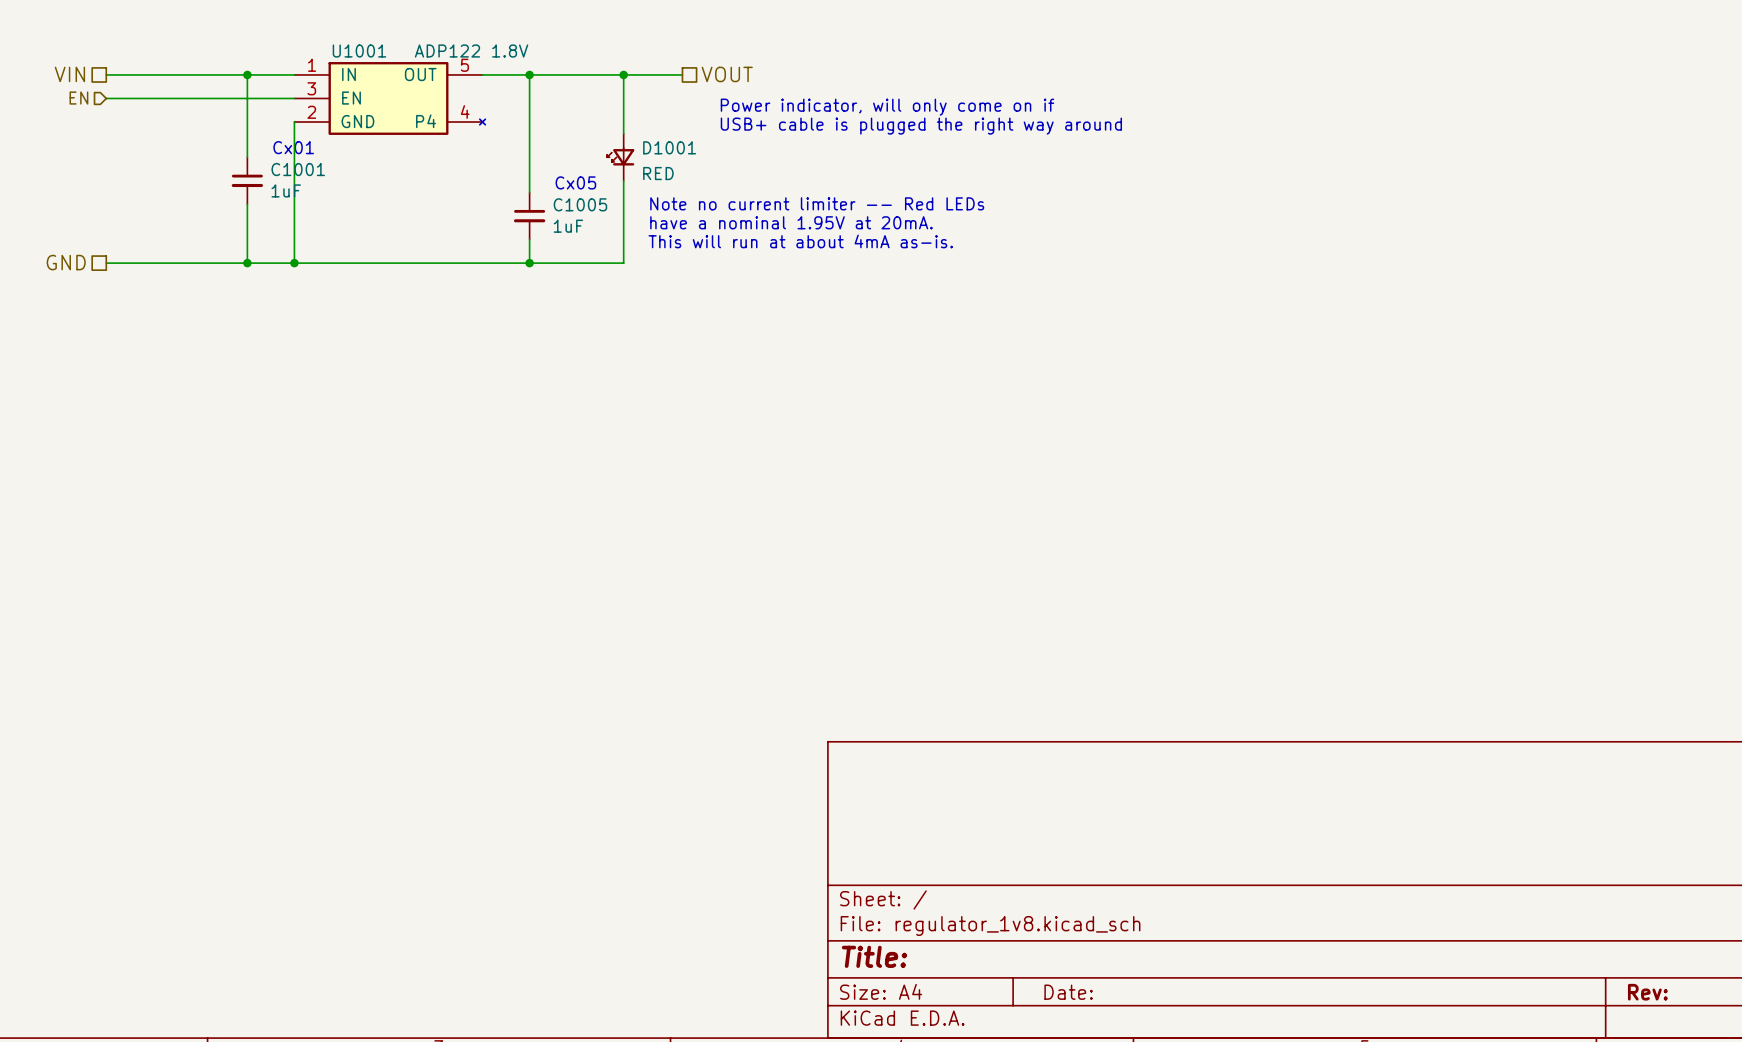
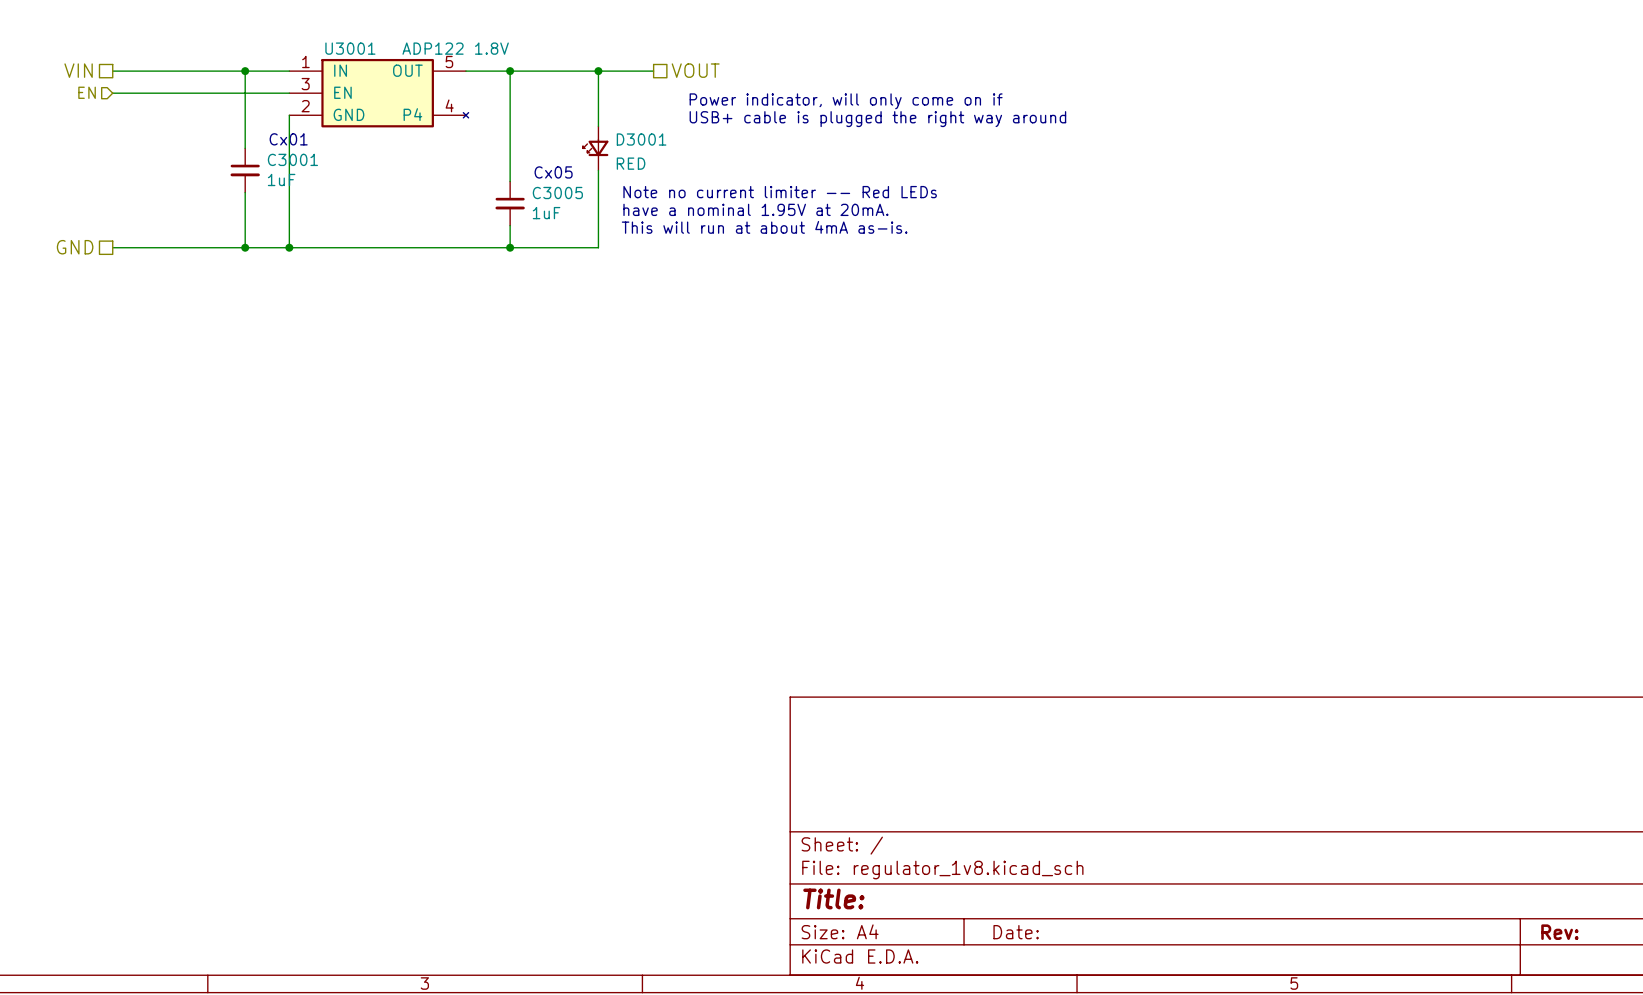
U1001 name: U1001 (359, 51) -> U3001 (350, 48)
D1001 name: D1001 (669, 147) -> D3001 (641, 139)
C1001 name: C1001 (298, 169) -> C3001 (292, 159)
C1005 name: C1005 (580, 204) -> C3005 (557, 193)

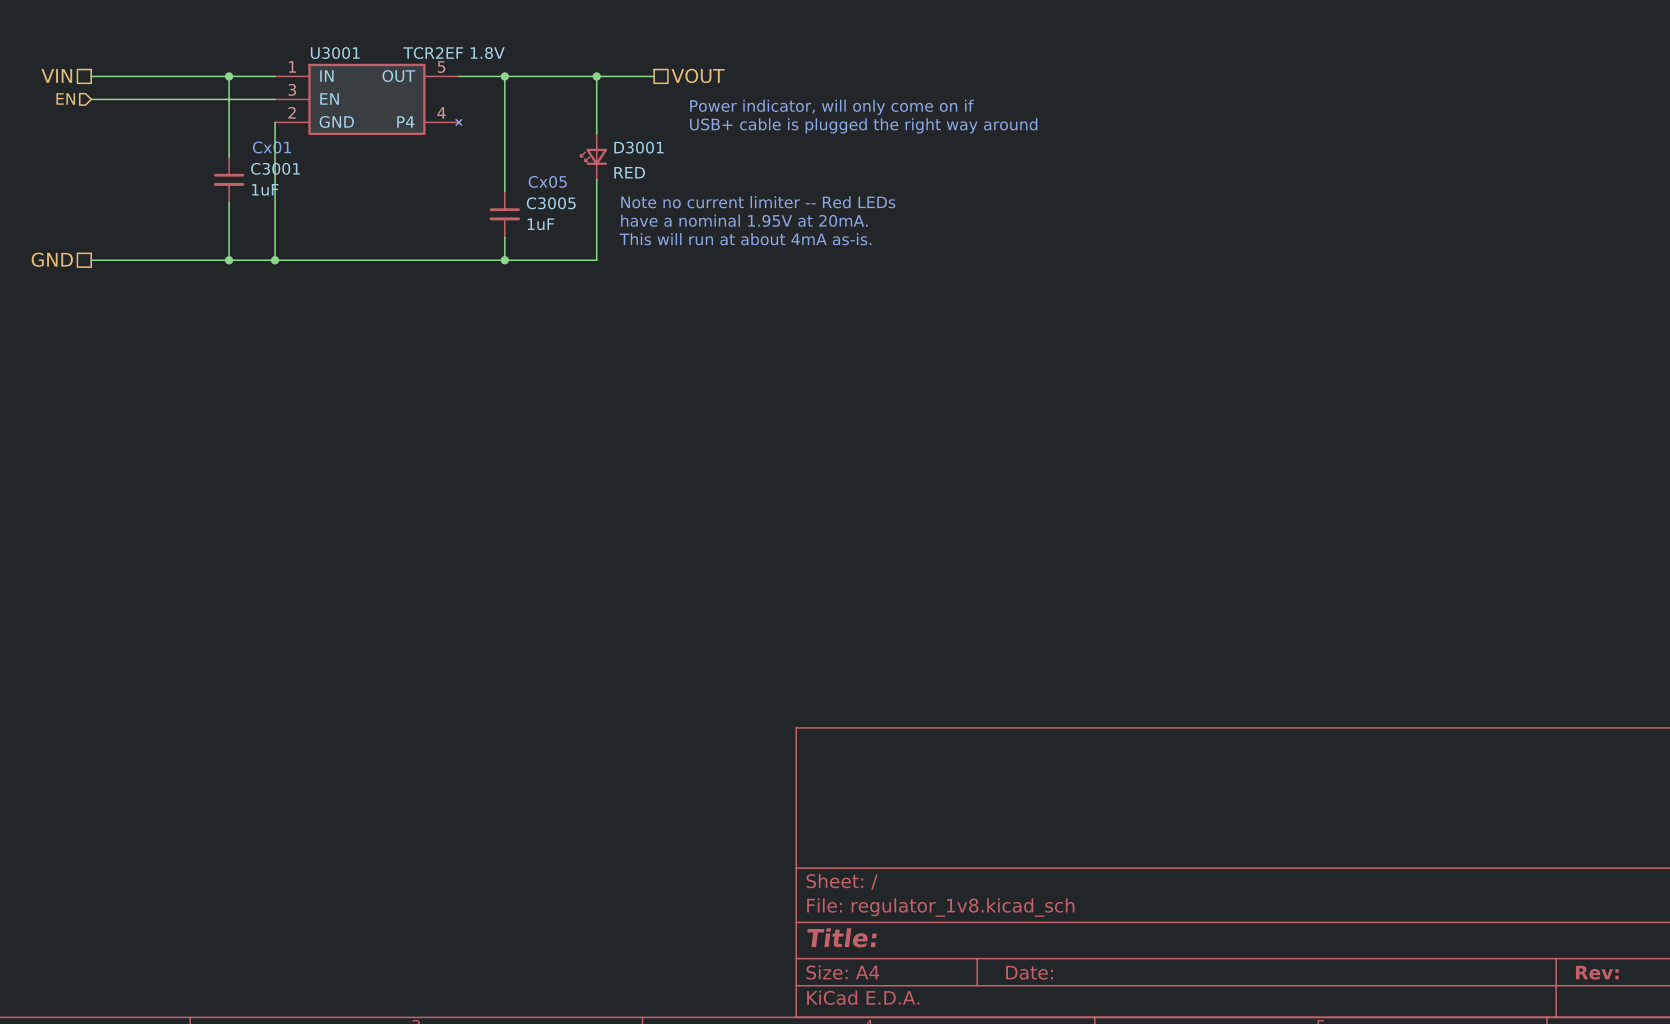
U3001 value: ADP122 1.8V (455, 48) -> TCR2EF 1.8V (453, 53)

